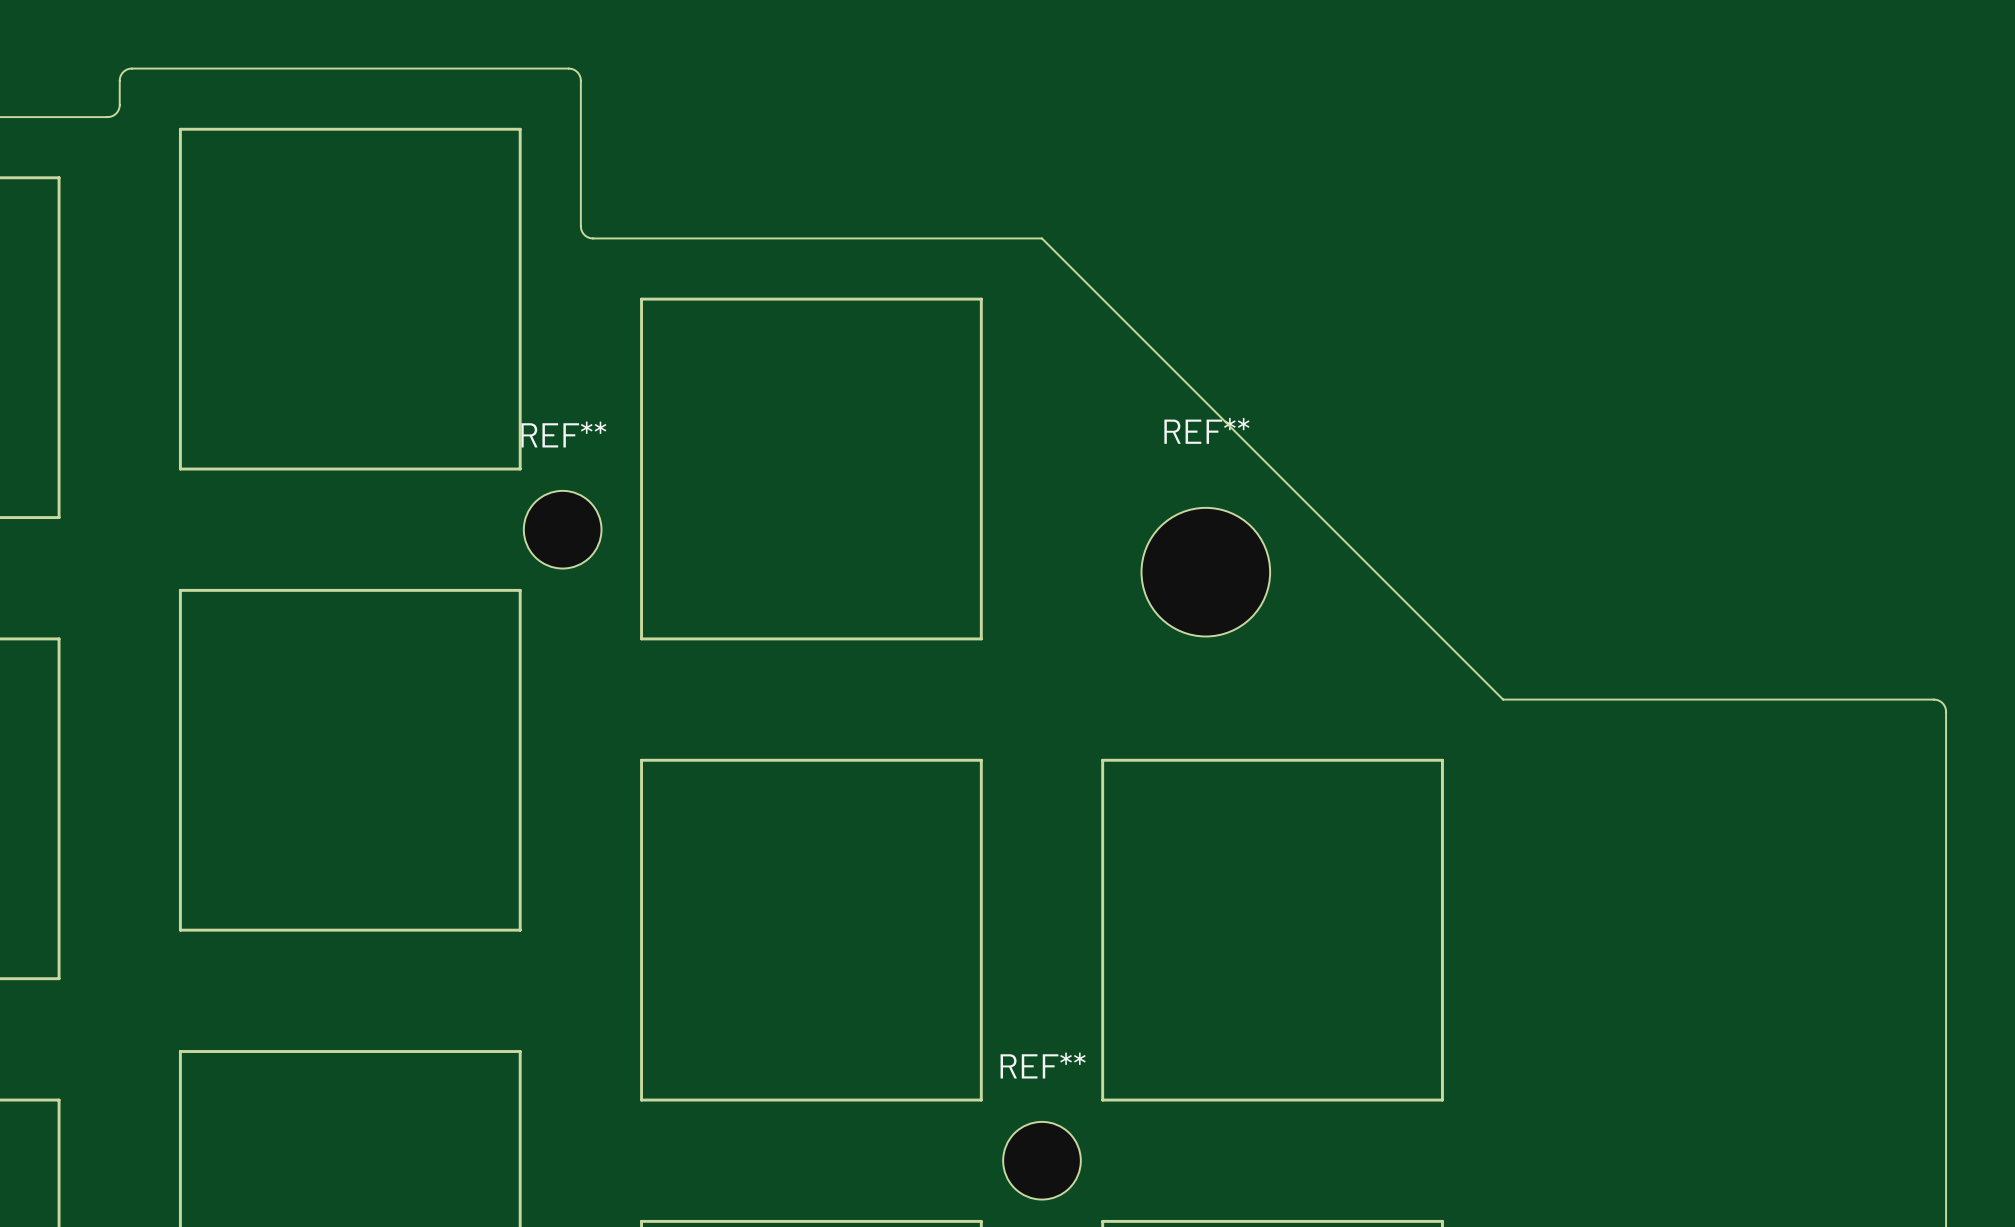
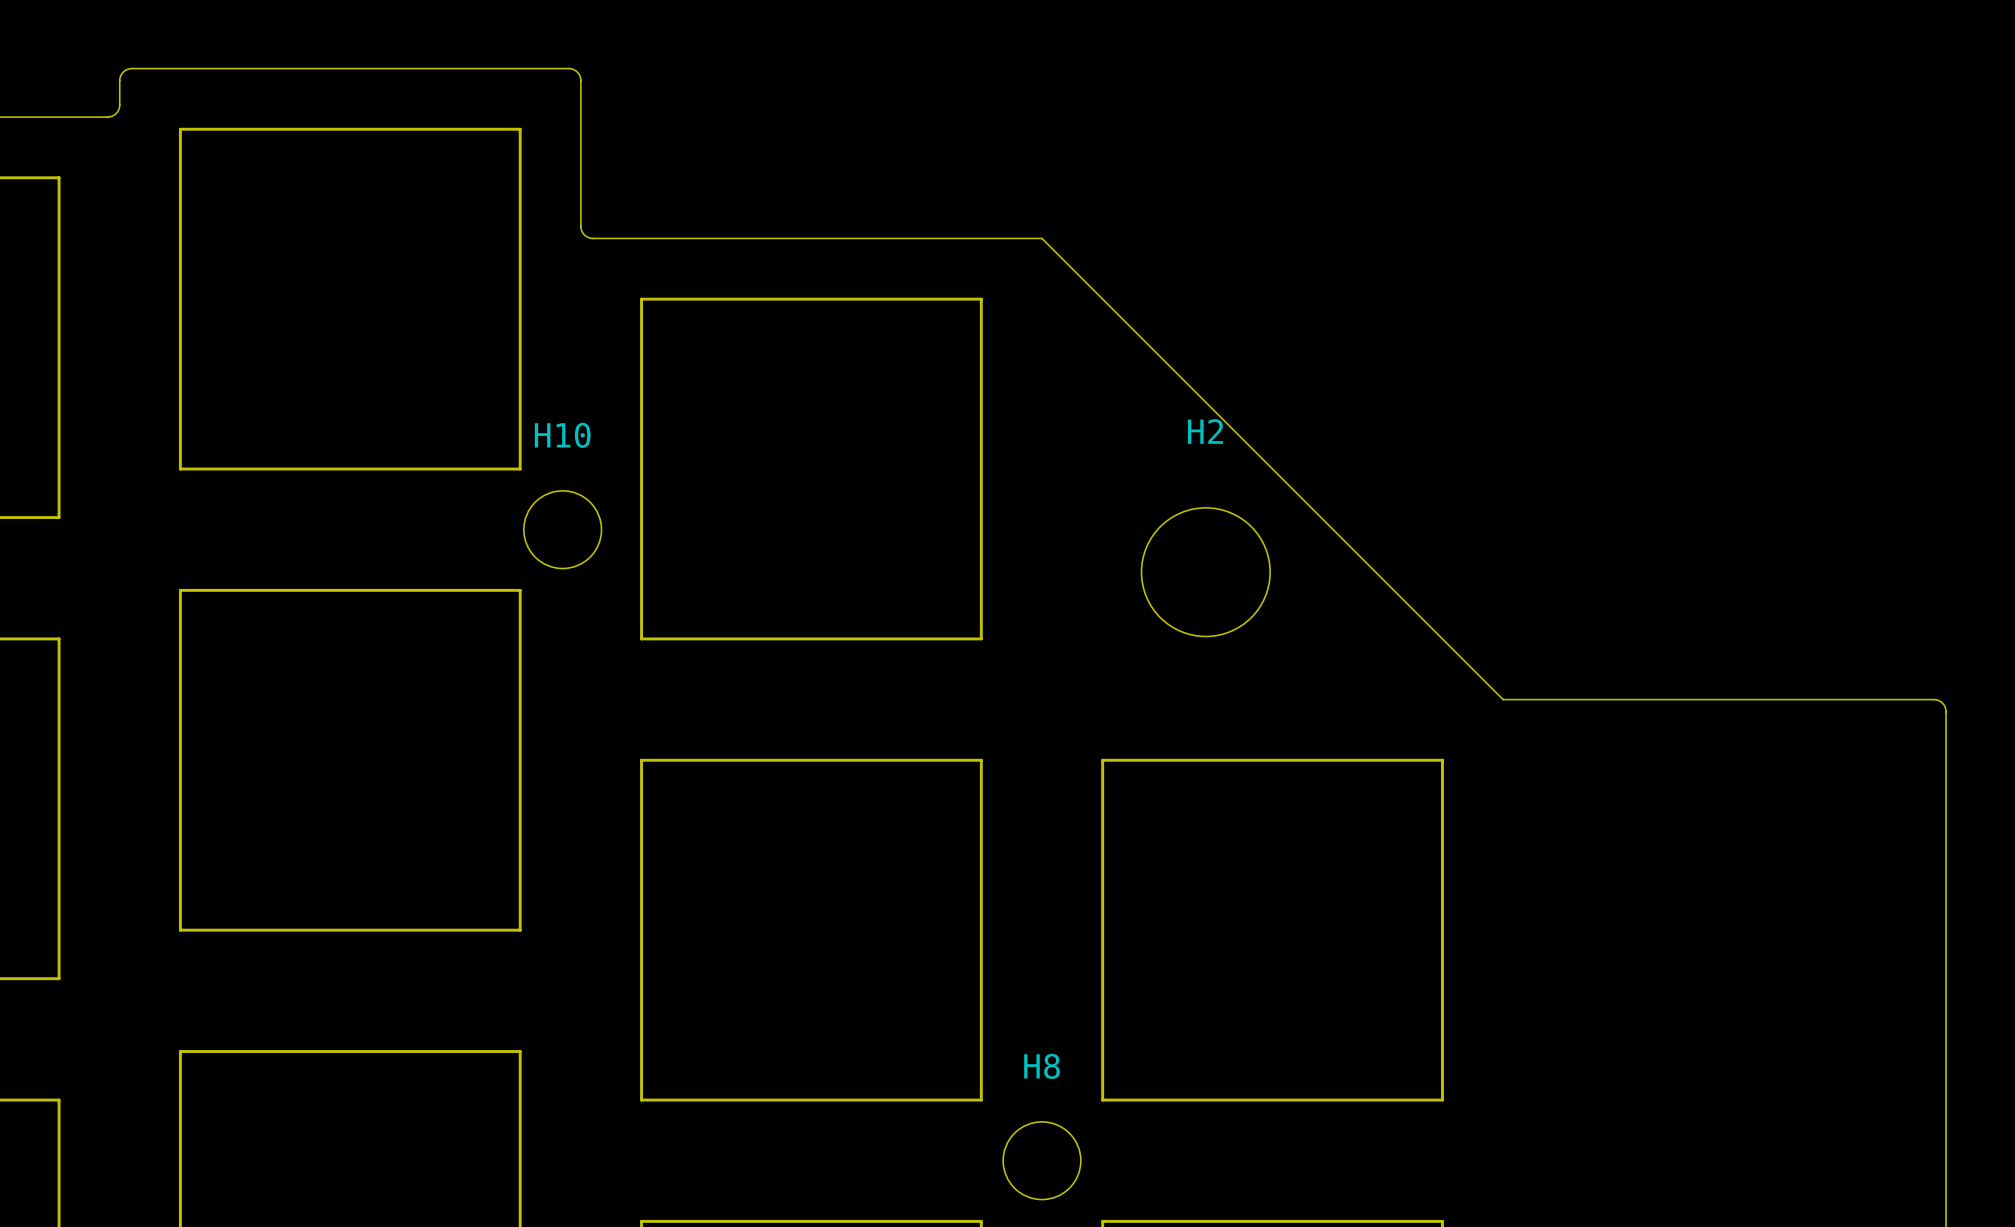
REF** name: REF** (1206, 430) -> H2 (1205, 431)
REF** name: REF** (563, 434) -> H10 (562, 435)
REF** name: REF** (1043, 1065) -> H8 (1042, 1066)

